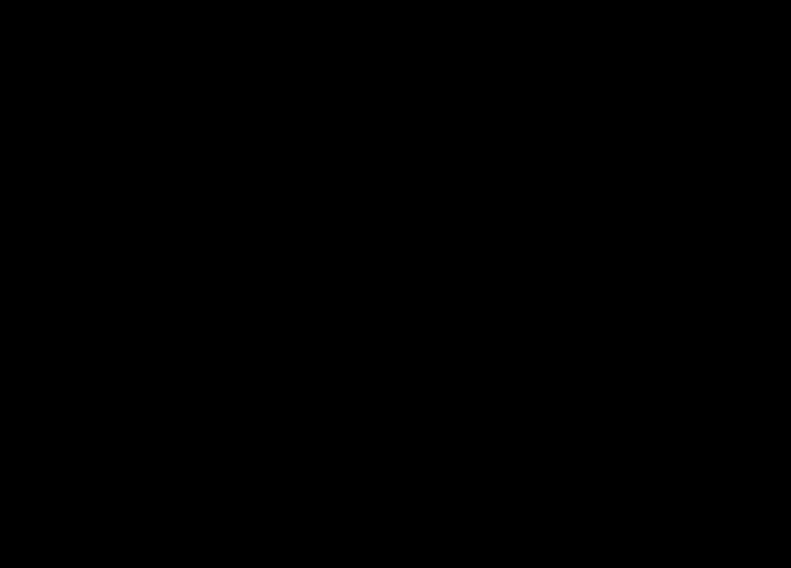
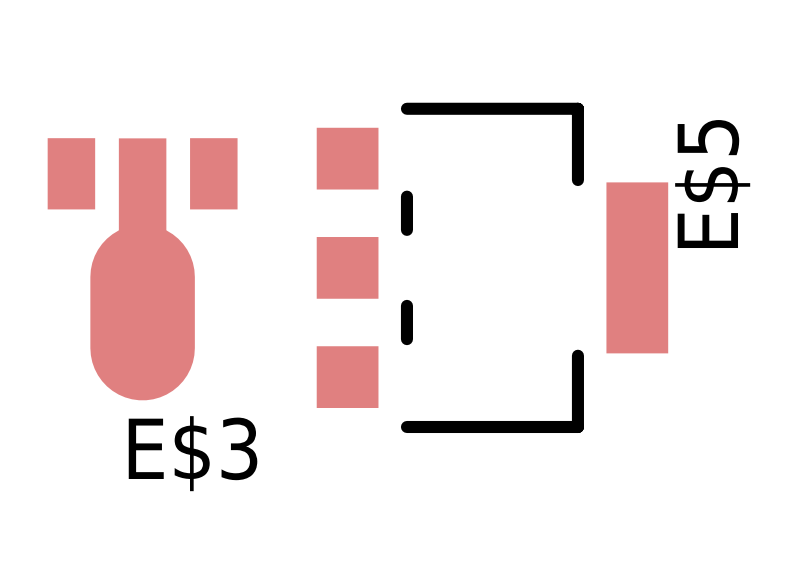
E$5: none -> (492, 267)
E$3: none -> (142, 269)

